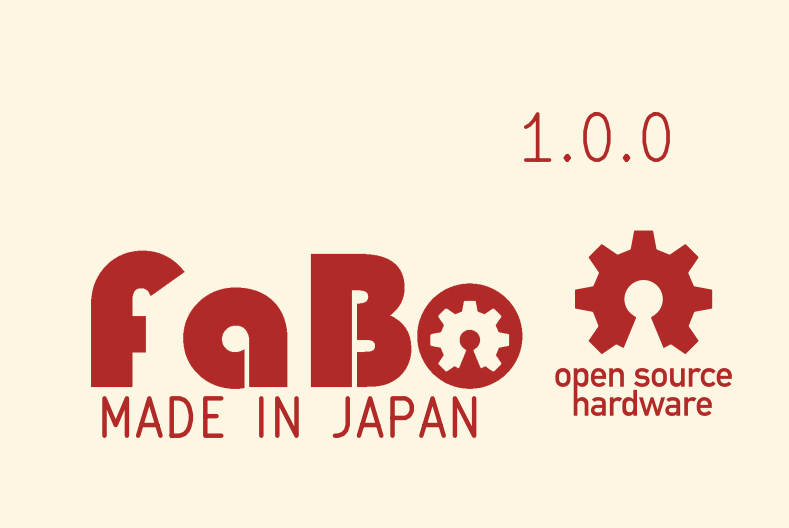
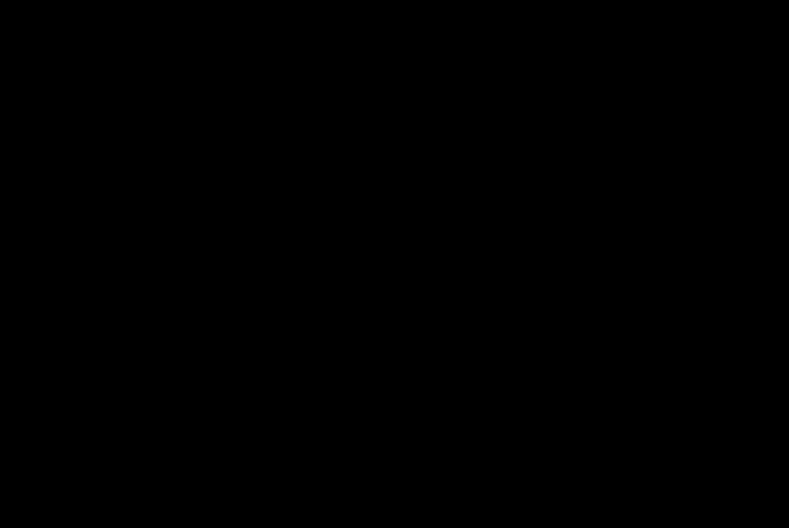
text: 1.0.0 (596, 137) -> none
part: (306, 319) -> none
part: (643, 323) -> none

